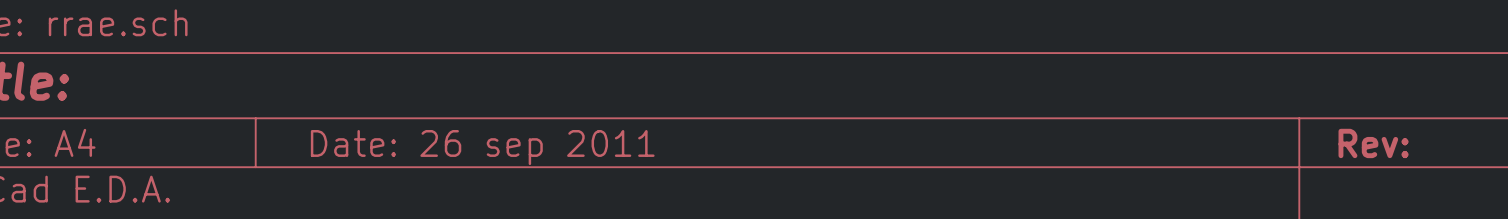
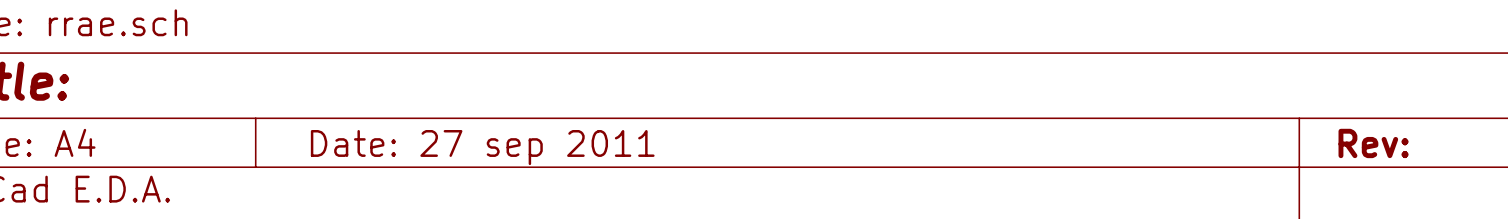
title block: Date: 26 sep 2011 (482, 147) -> Date: 27 sep 2011 (482, 147)

